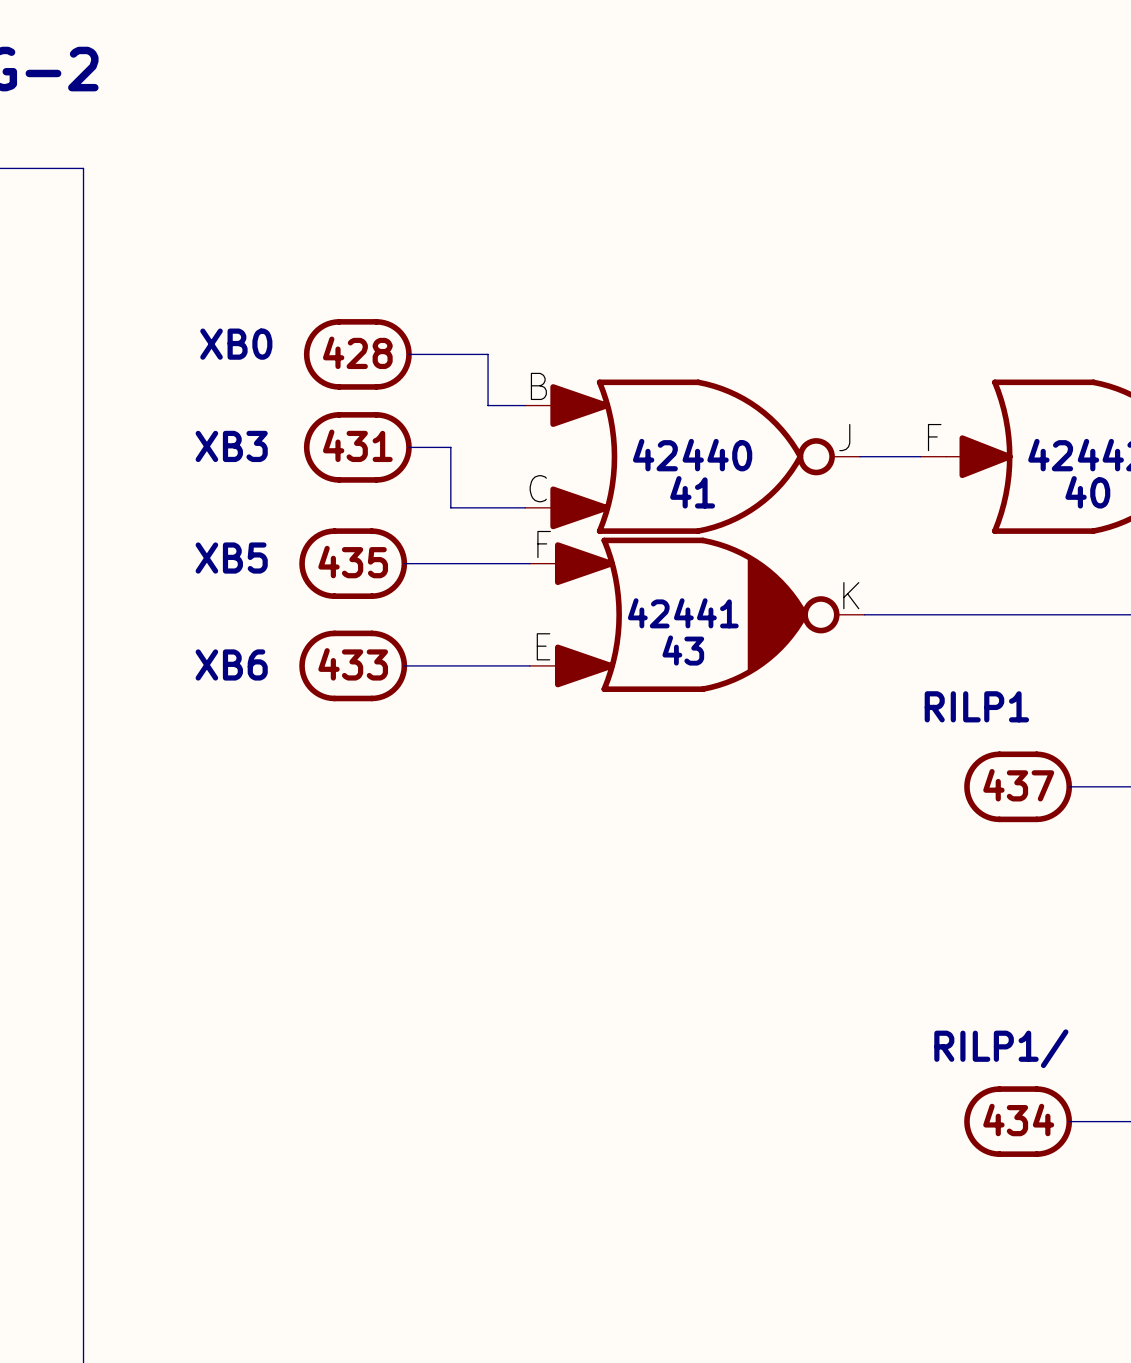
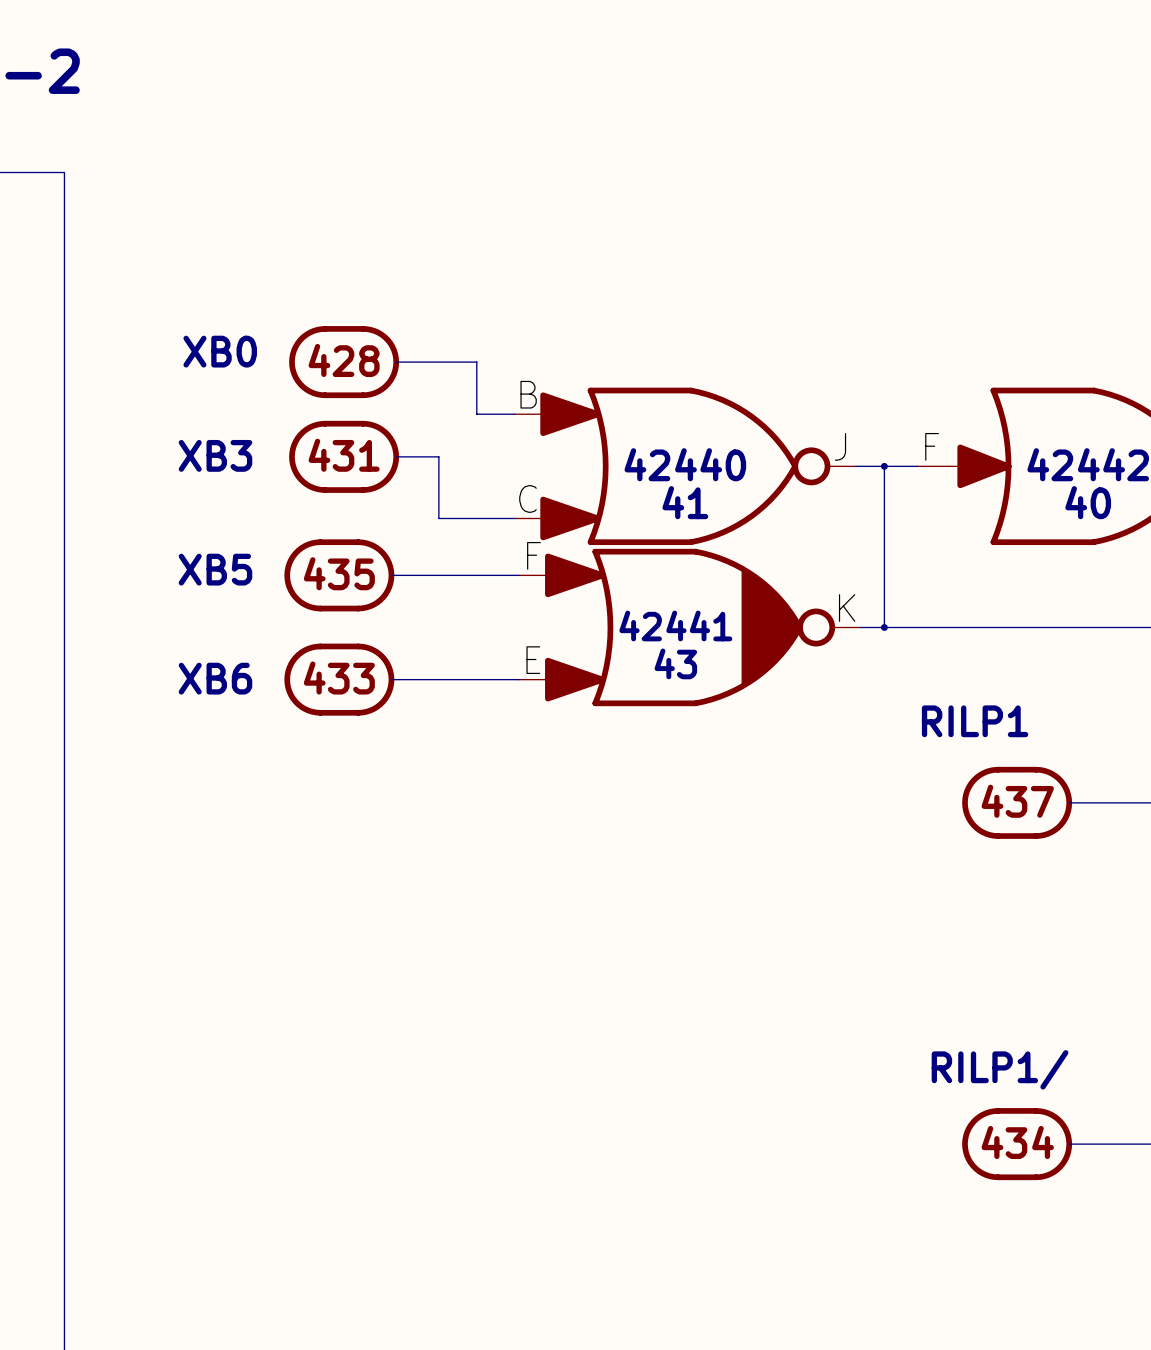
wire: none -> (884, 466) (884, 627)
junction: none -> (884, 466)
junction: none -> (884, 627)

